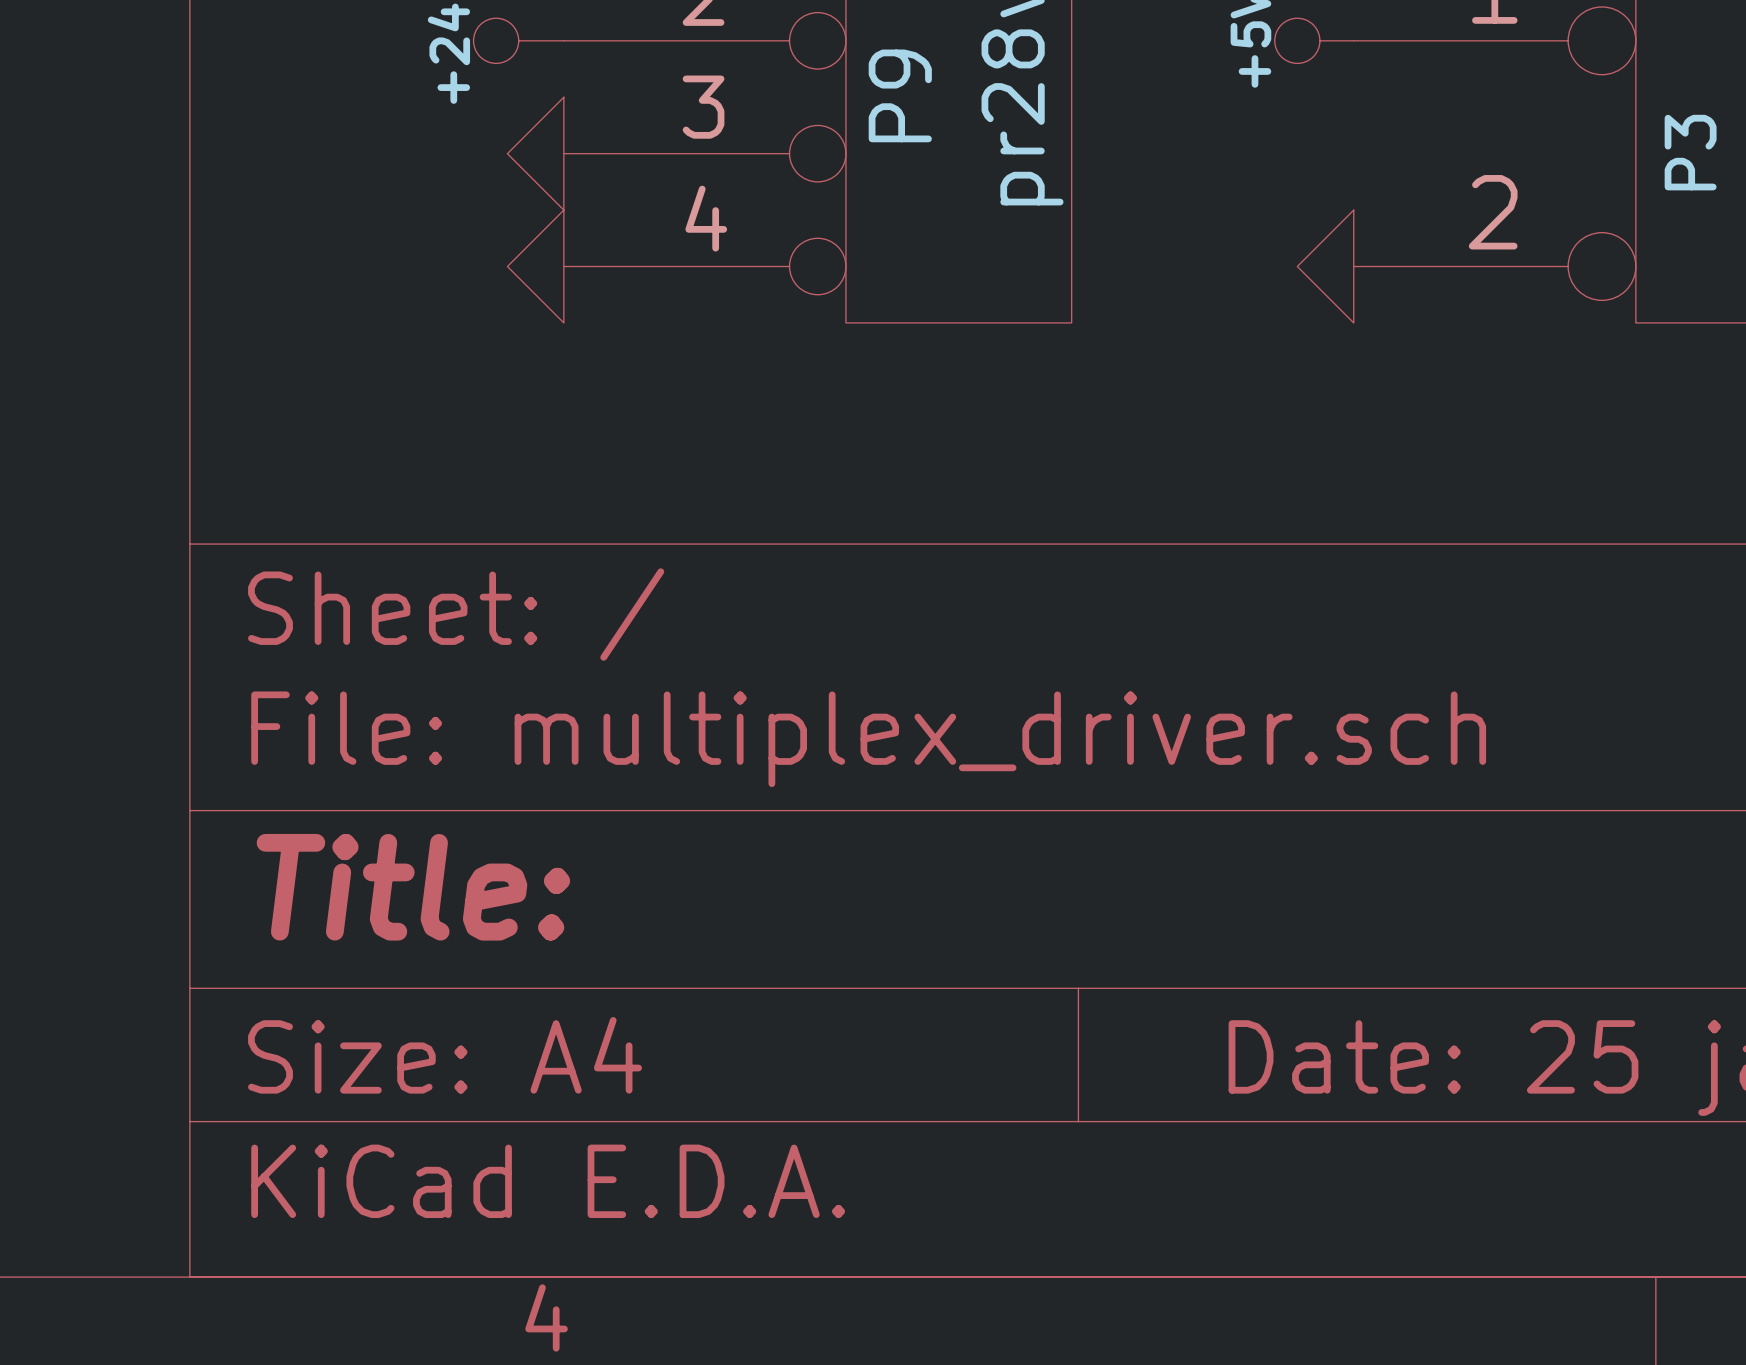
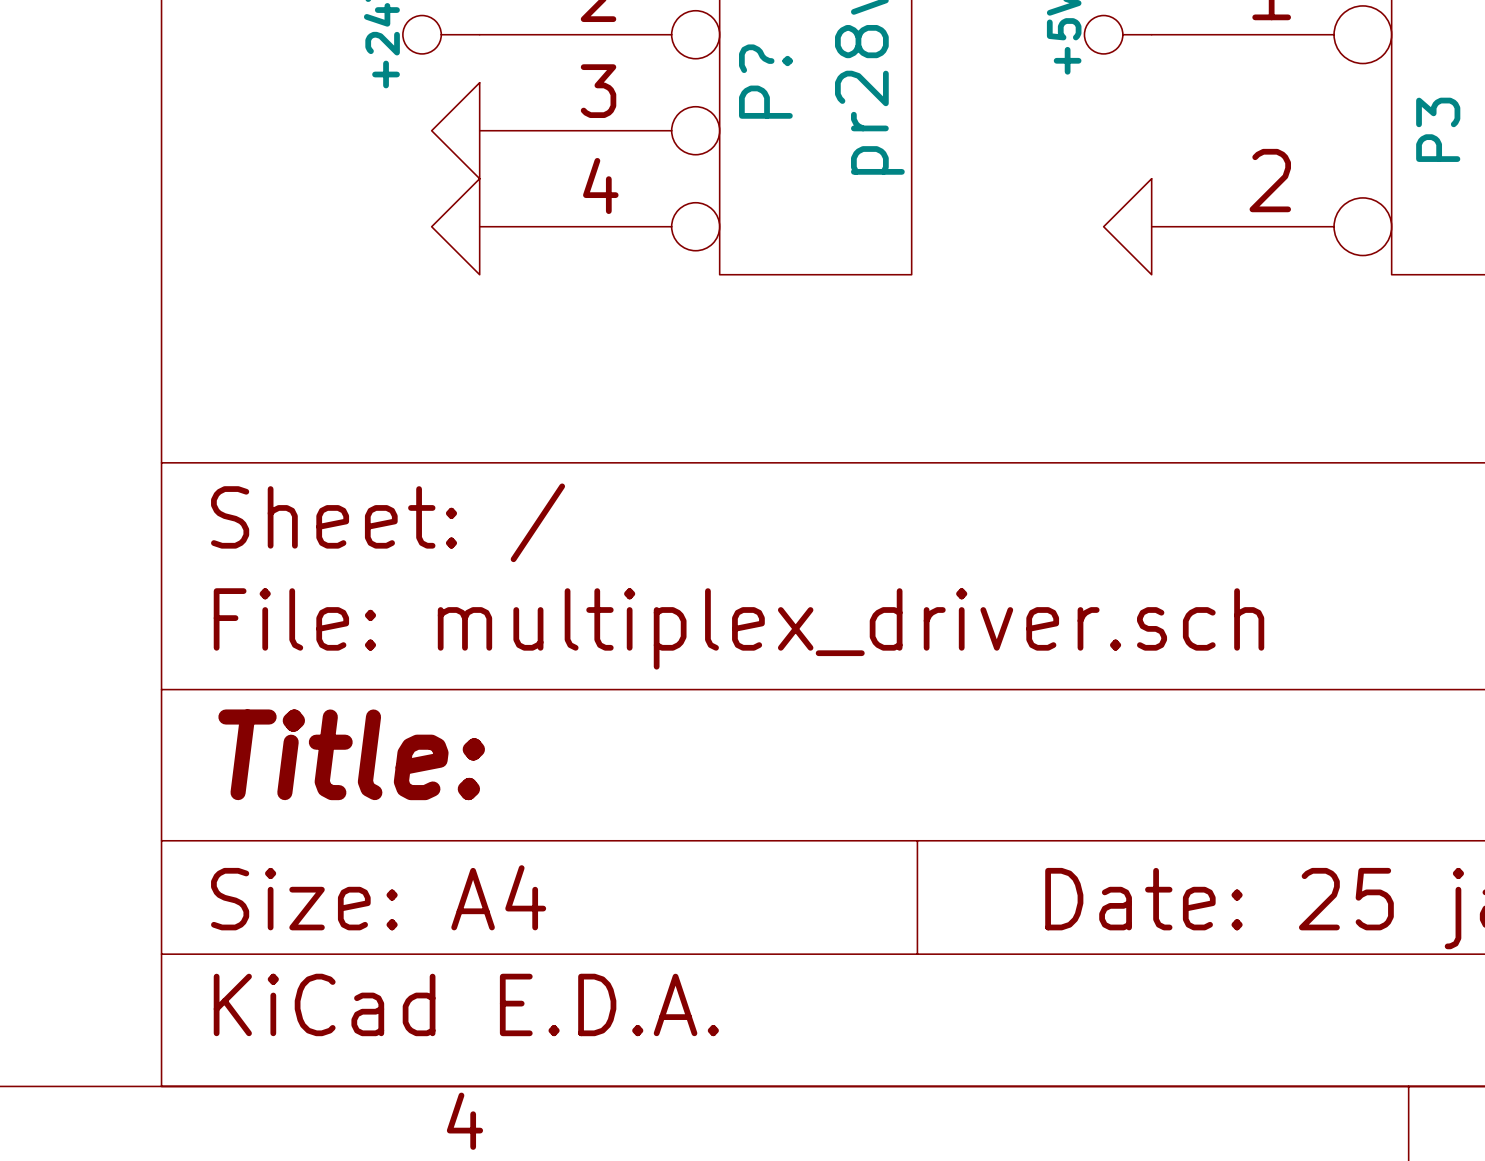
P9 name: P9 (900, 95) -> P? (765, 81)

